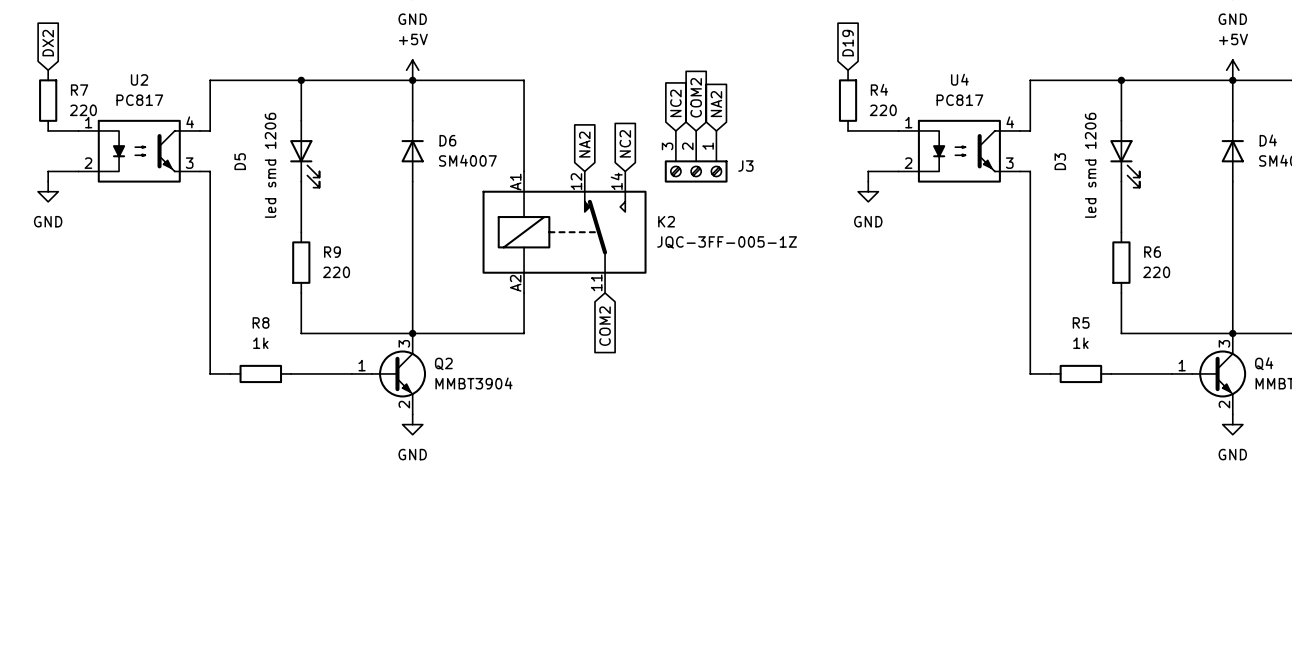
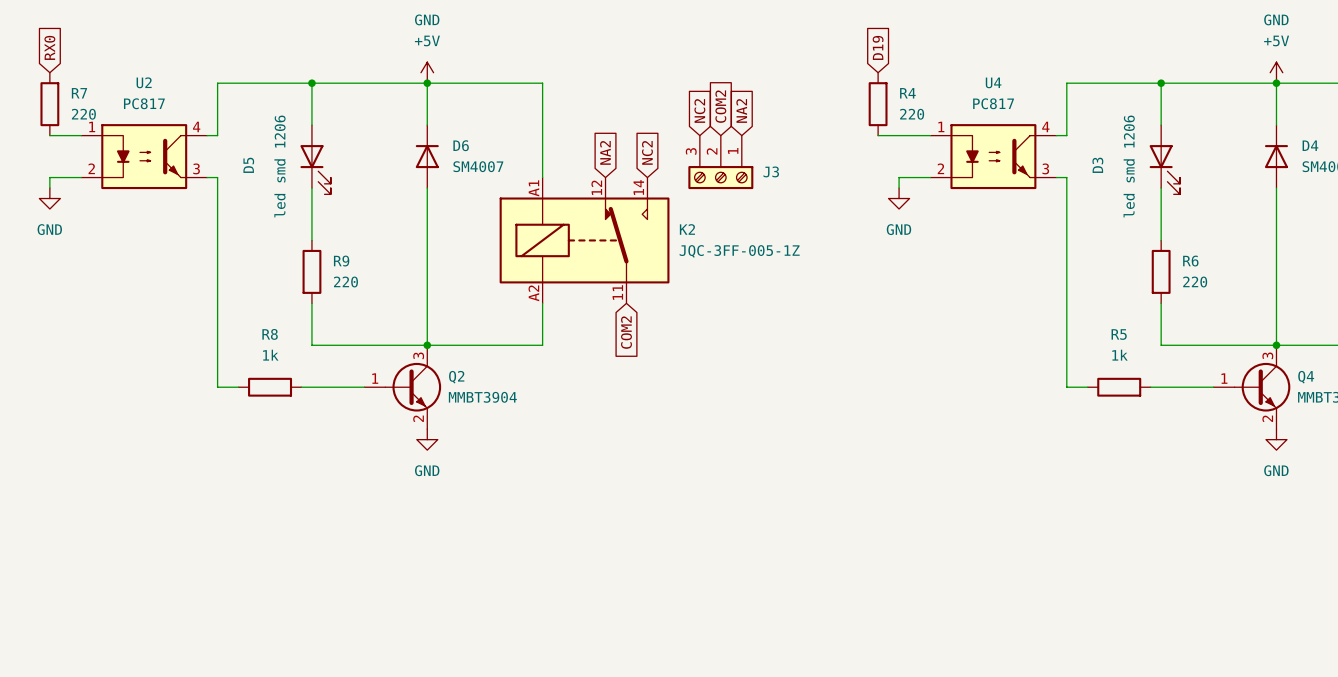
global label: DX2 (48, 43) -> RX0 (49, 47)

